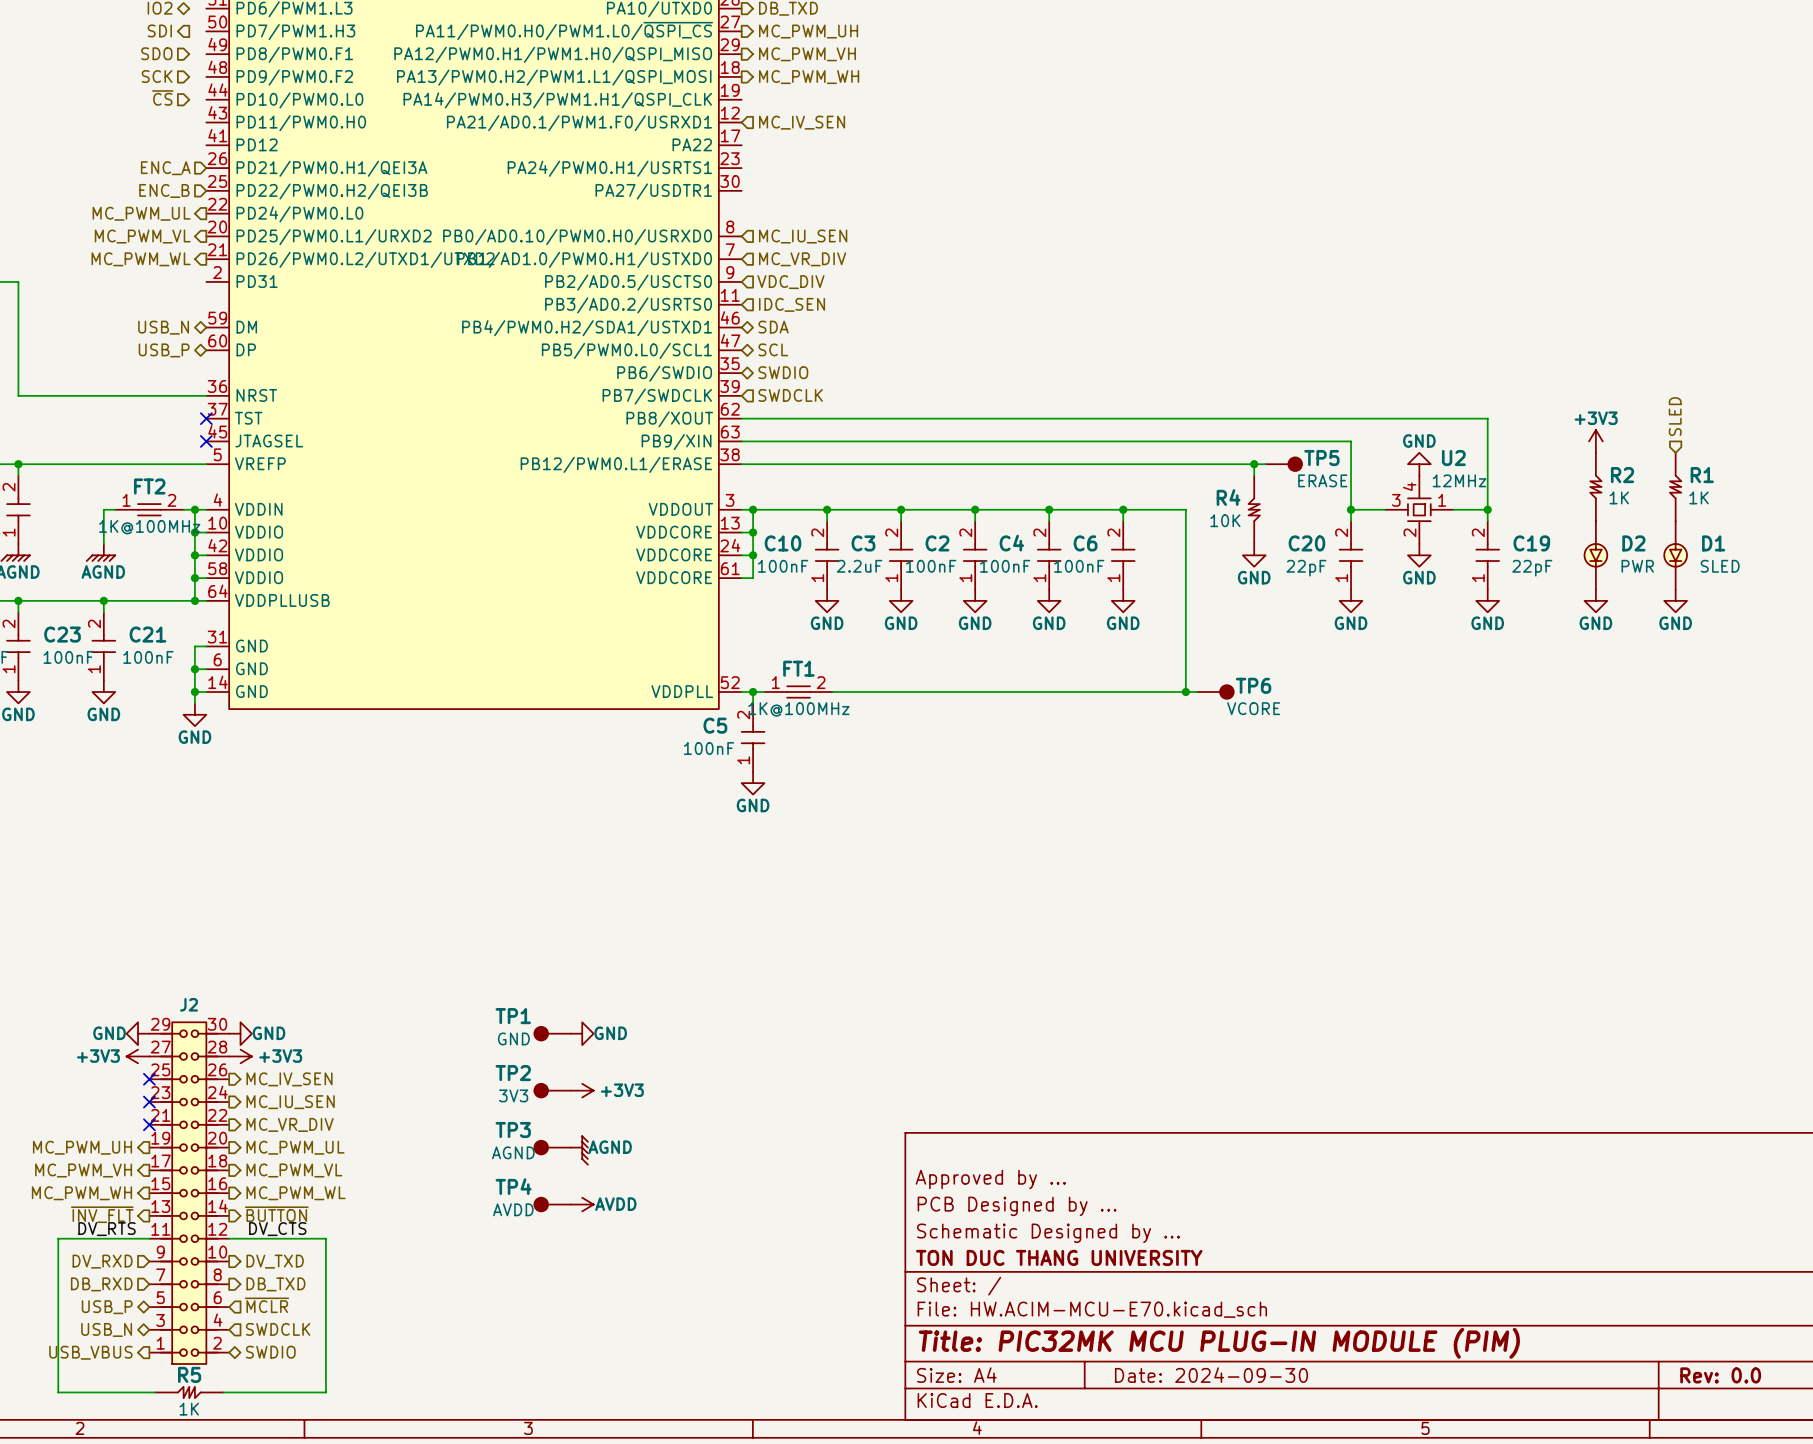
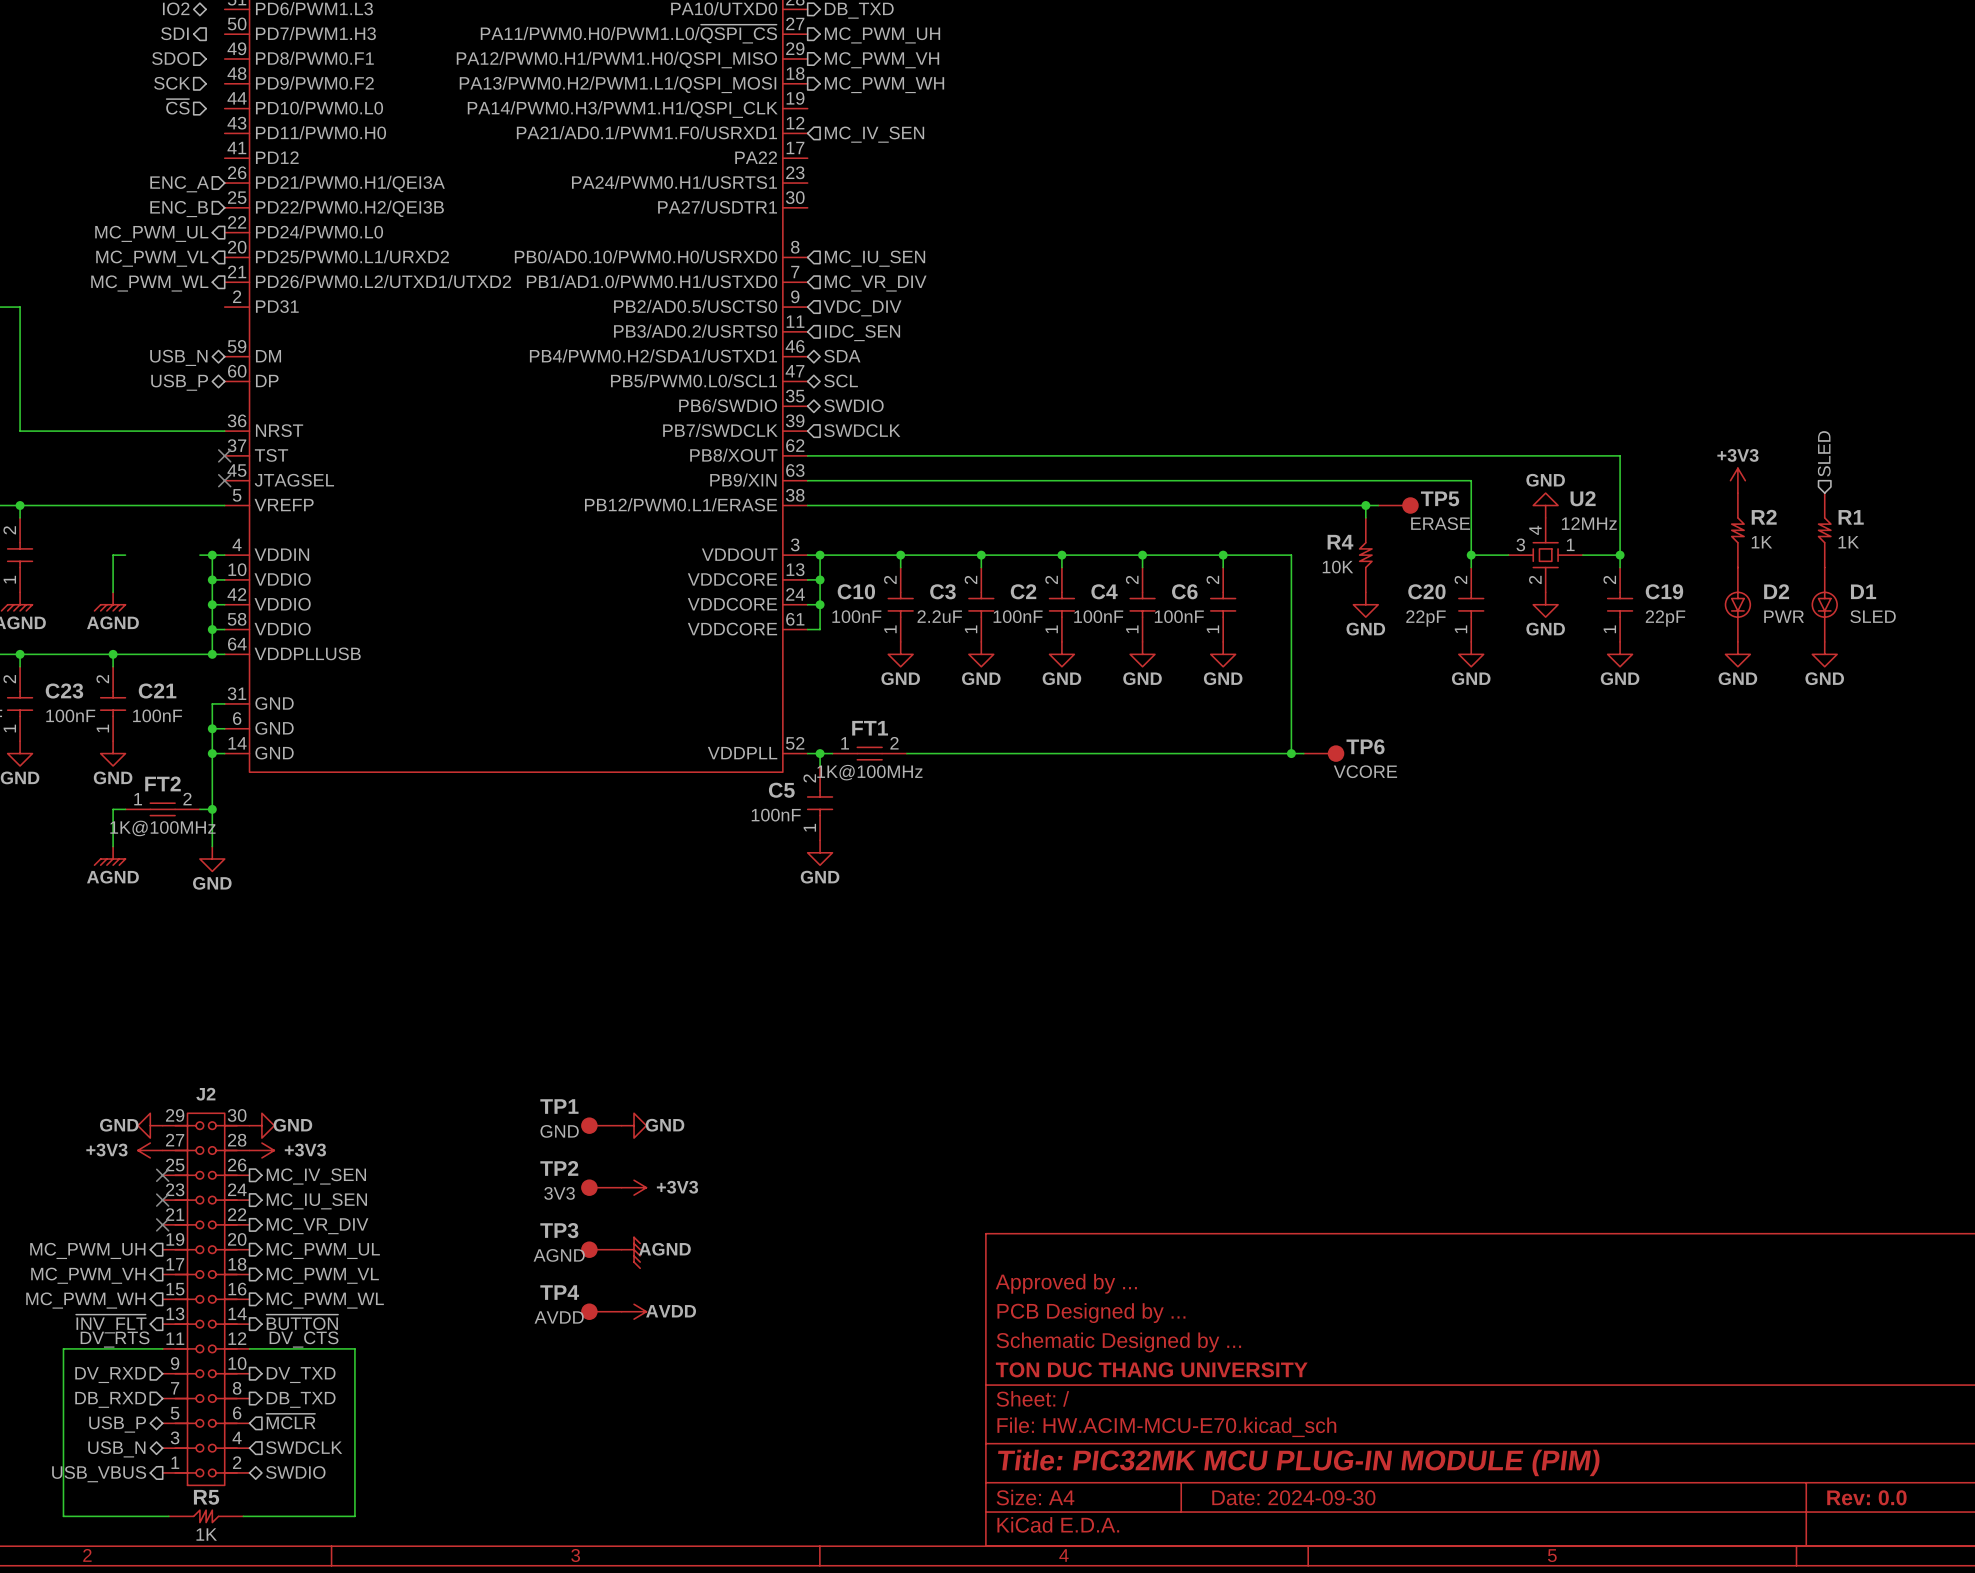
FT2 position: (149, 509) -> (162, 809)
wire: none -> (212, 765) (212, 846)
power symbol position: GND (194, 714) -> GND (212, 859)
wire: none -> (125, 809) (113, 809) (113, 846)
wire: none -> (199, 809) (212, 809)
junction: none -> (212, 809)
power symbol: none -> AGND (109, 855)

